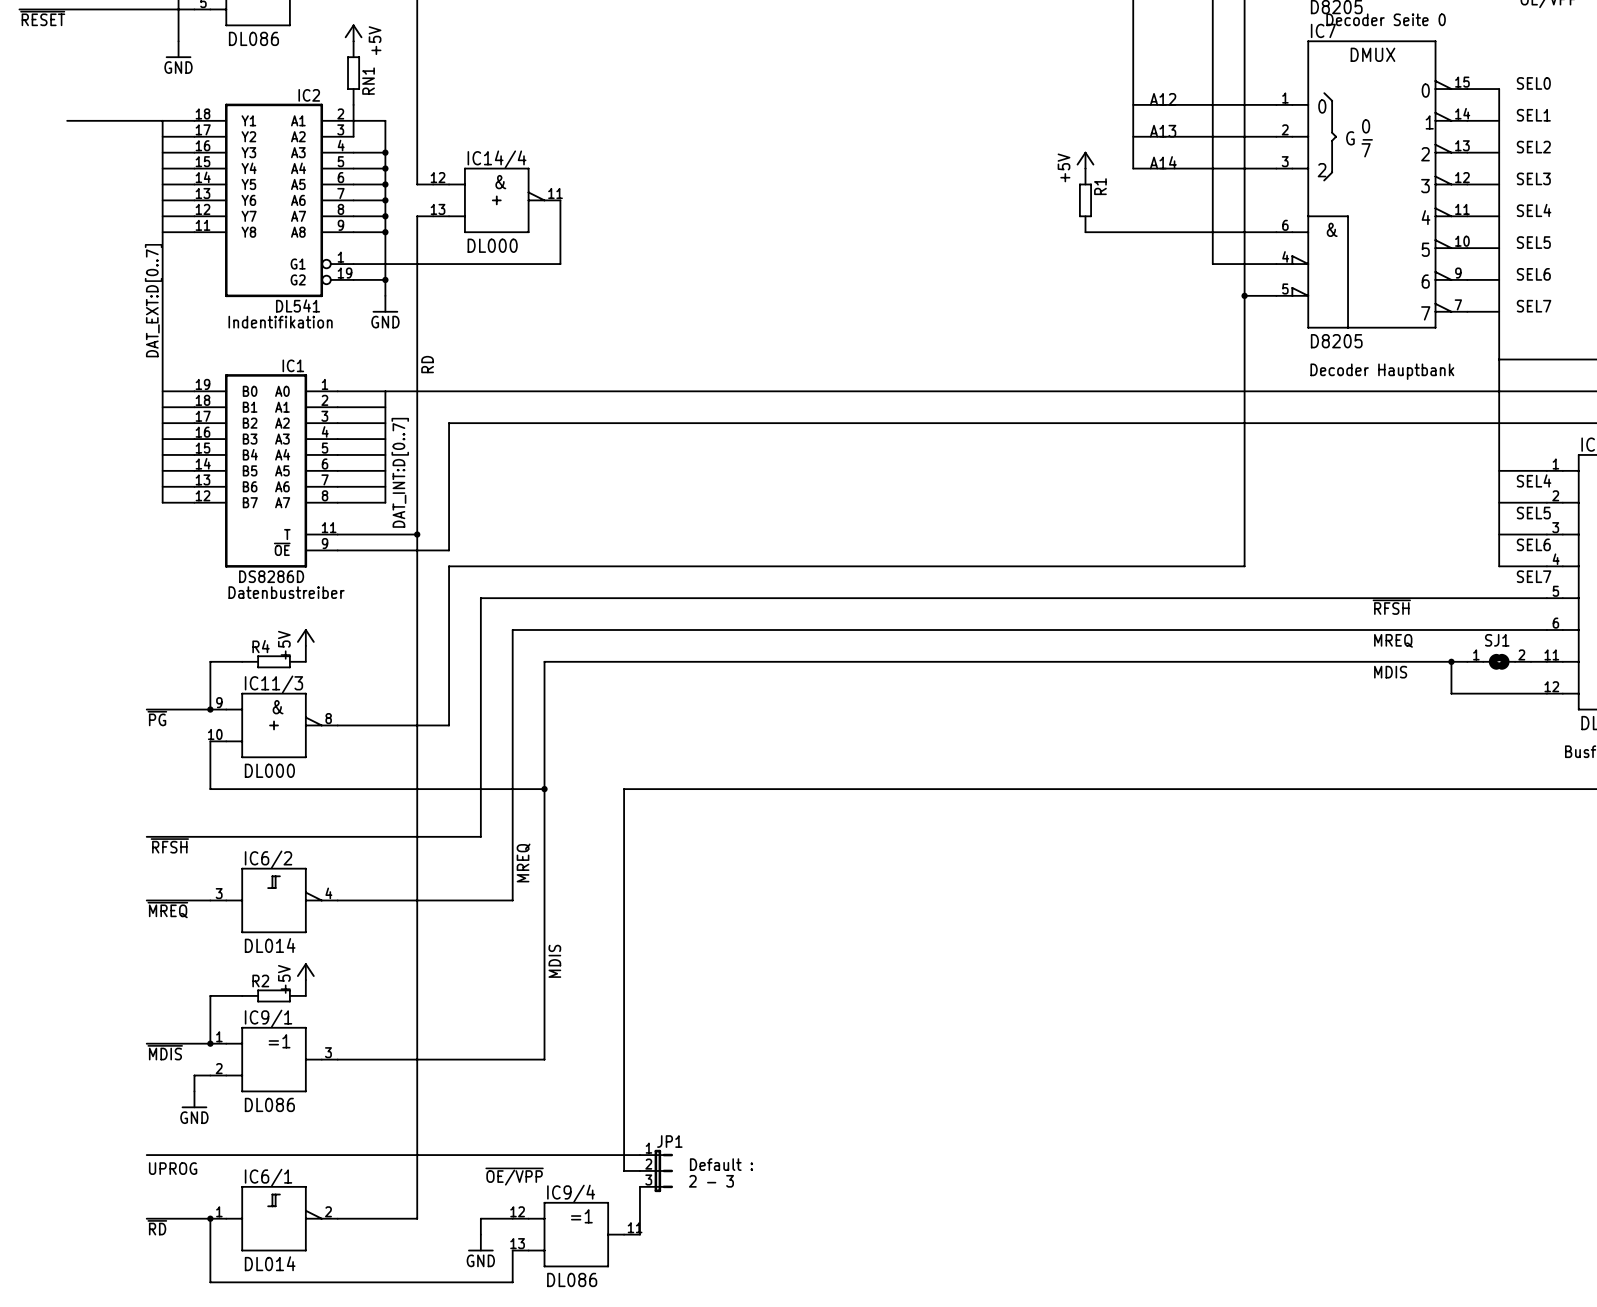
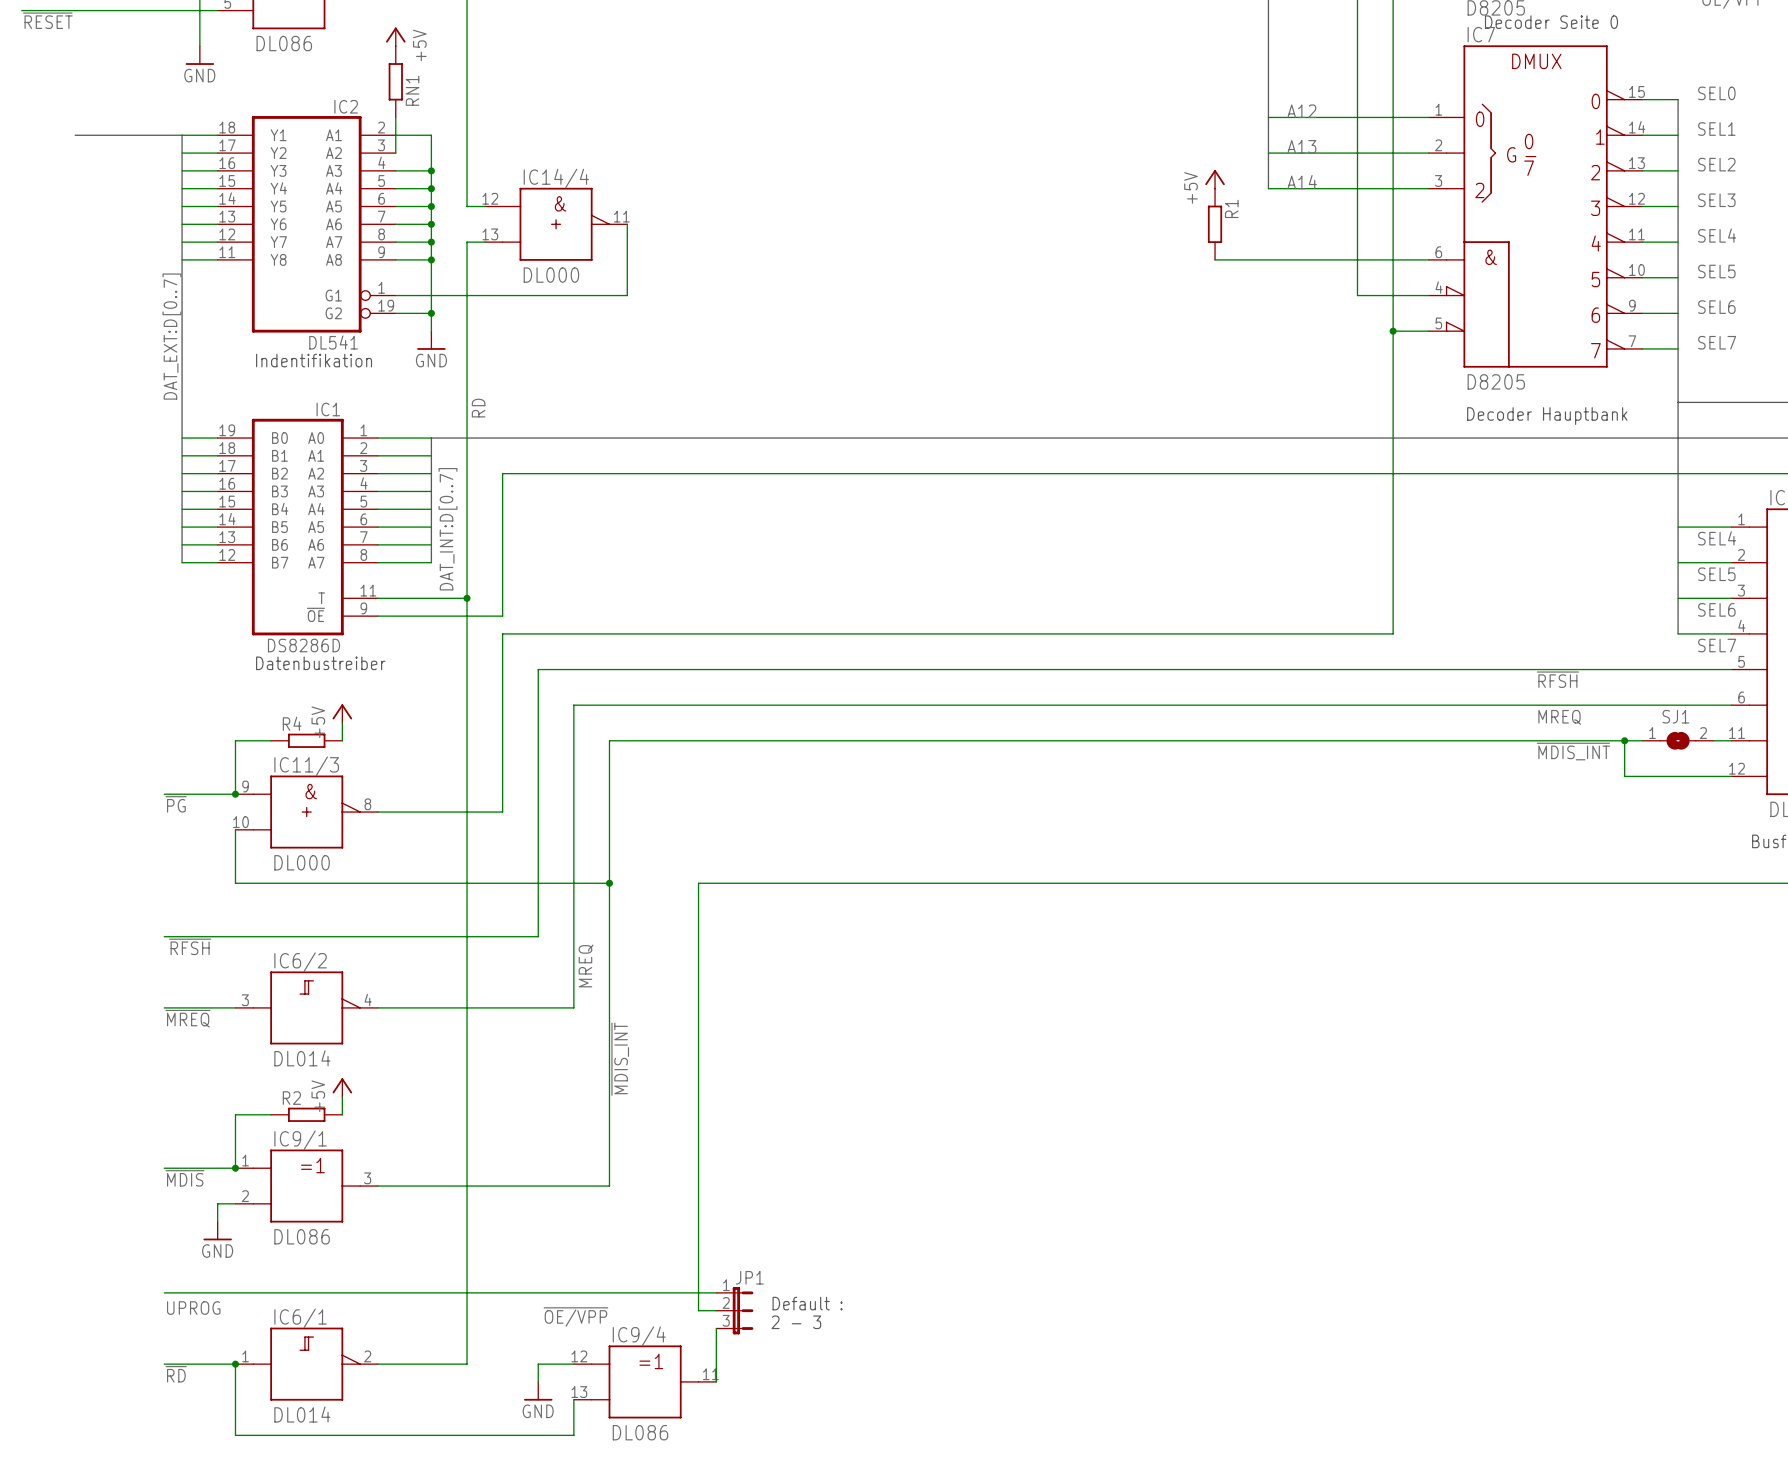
label: MDIS (1390, 672) -> ~{MDIS_INT} (1573, 751)
label: MDIS (554, 961) -> ~{MDIS_INT} (620, 1059)

